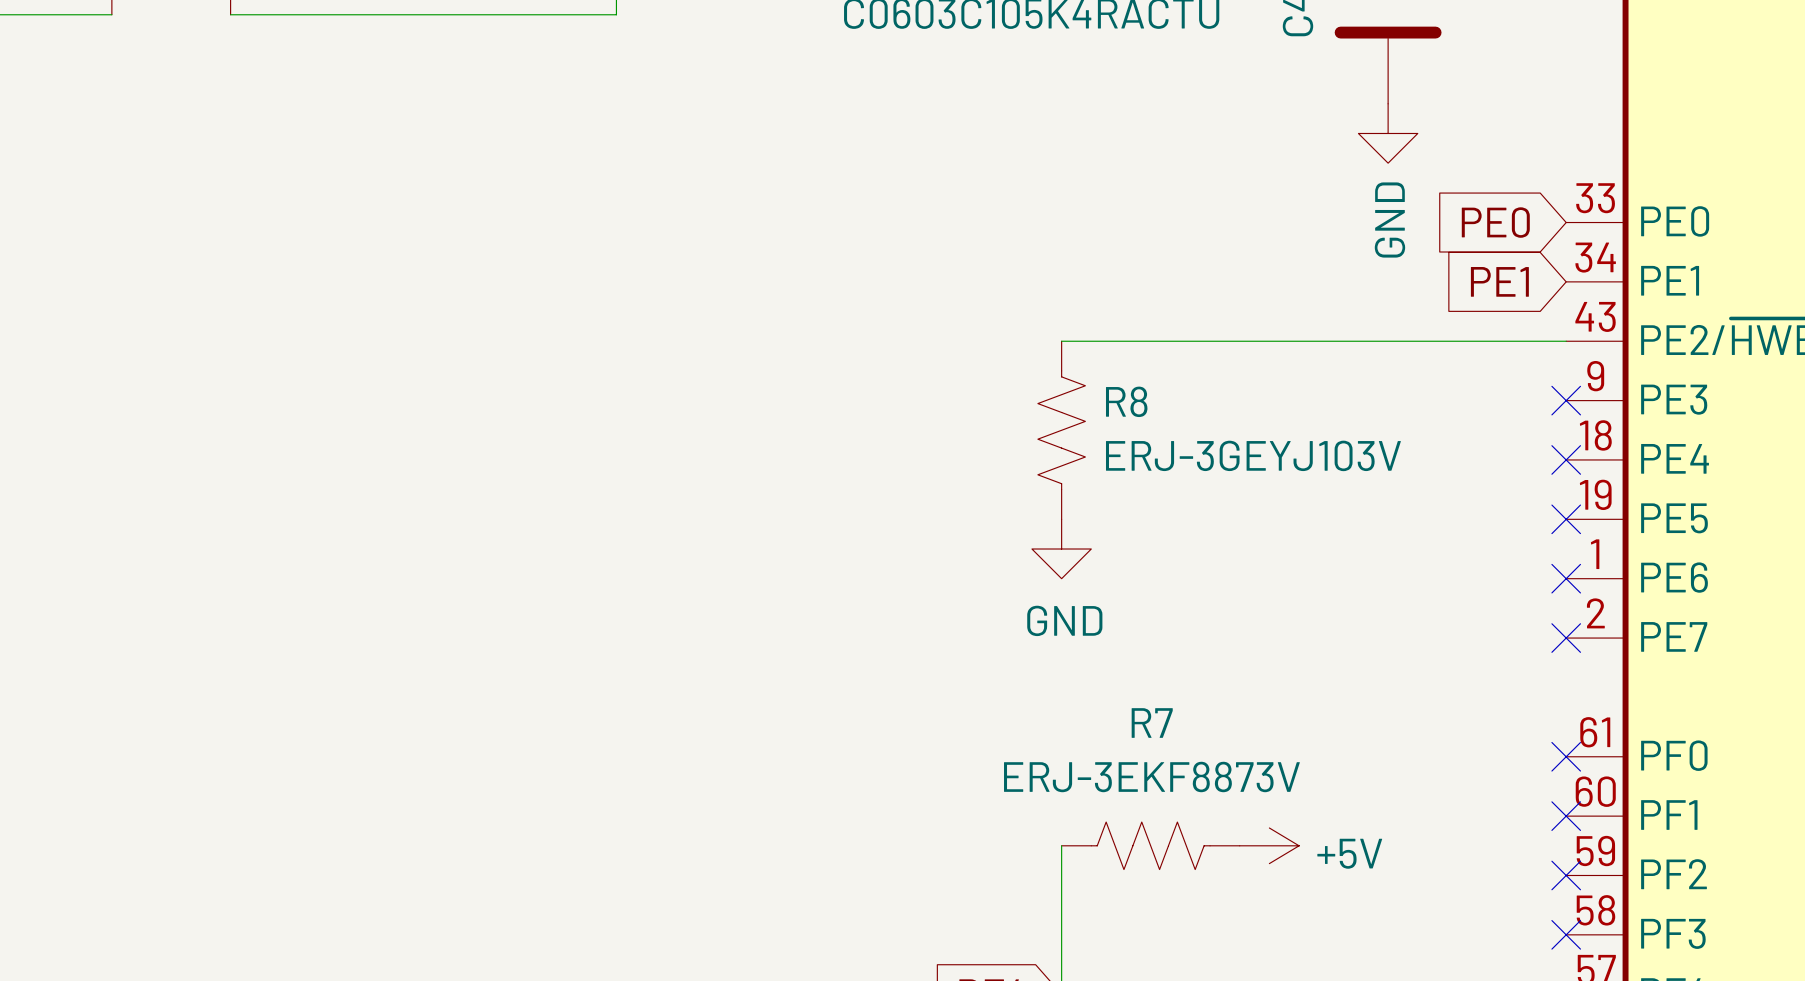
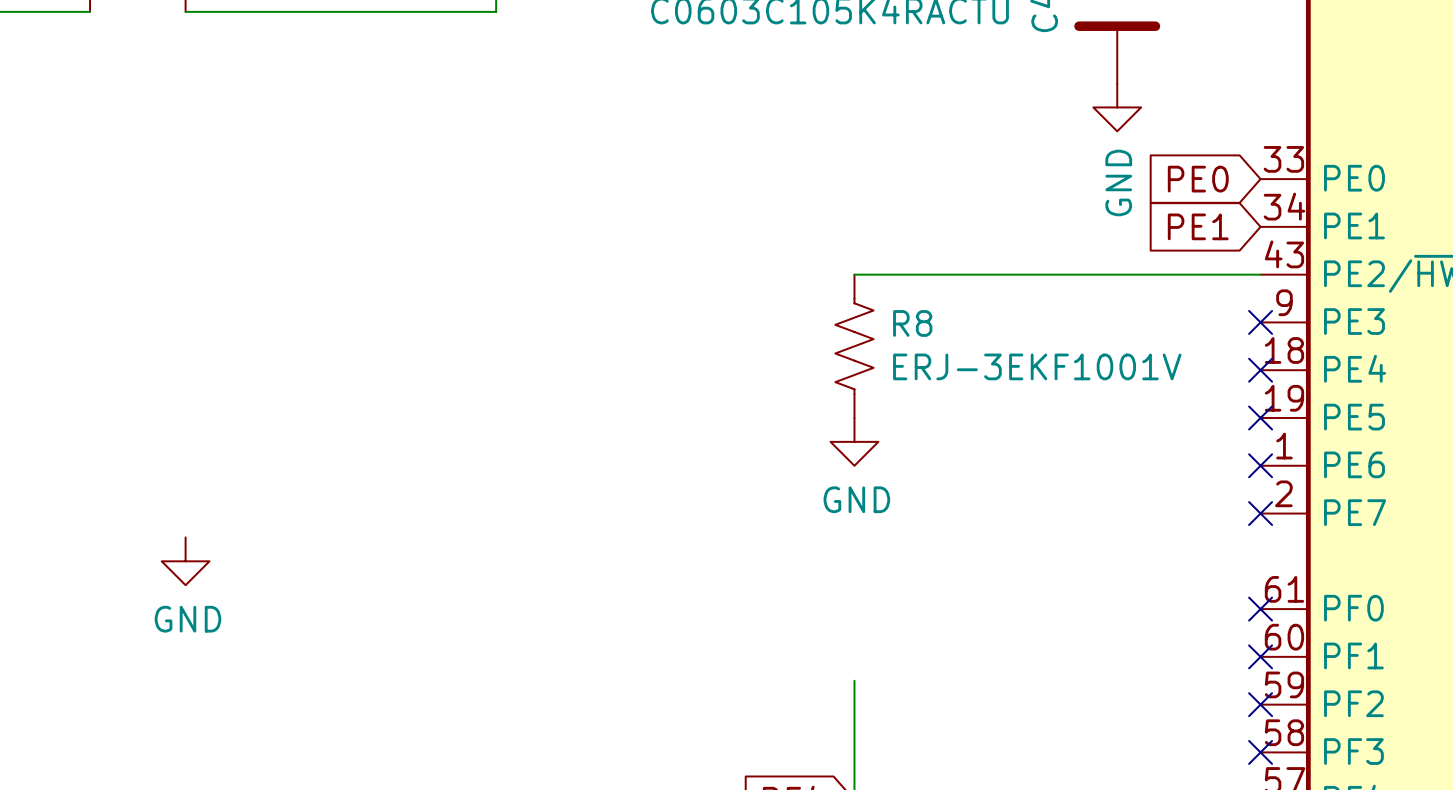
R8 value: ERJ-3GEYJ103V (1253, 455) -> ERJ-3EKF1001V (1037, 366)
power symbol: none -> GND (185, 561)
R7: ERJ-3EKF8873V (1150, 845) -> none
power symbol: +5V (1269, 845) -> none

